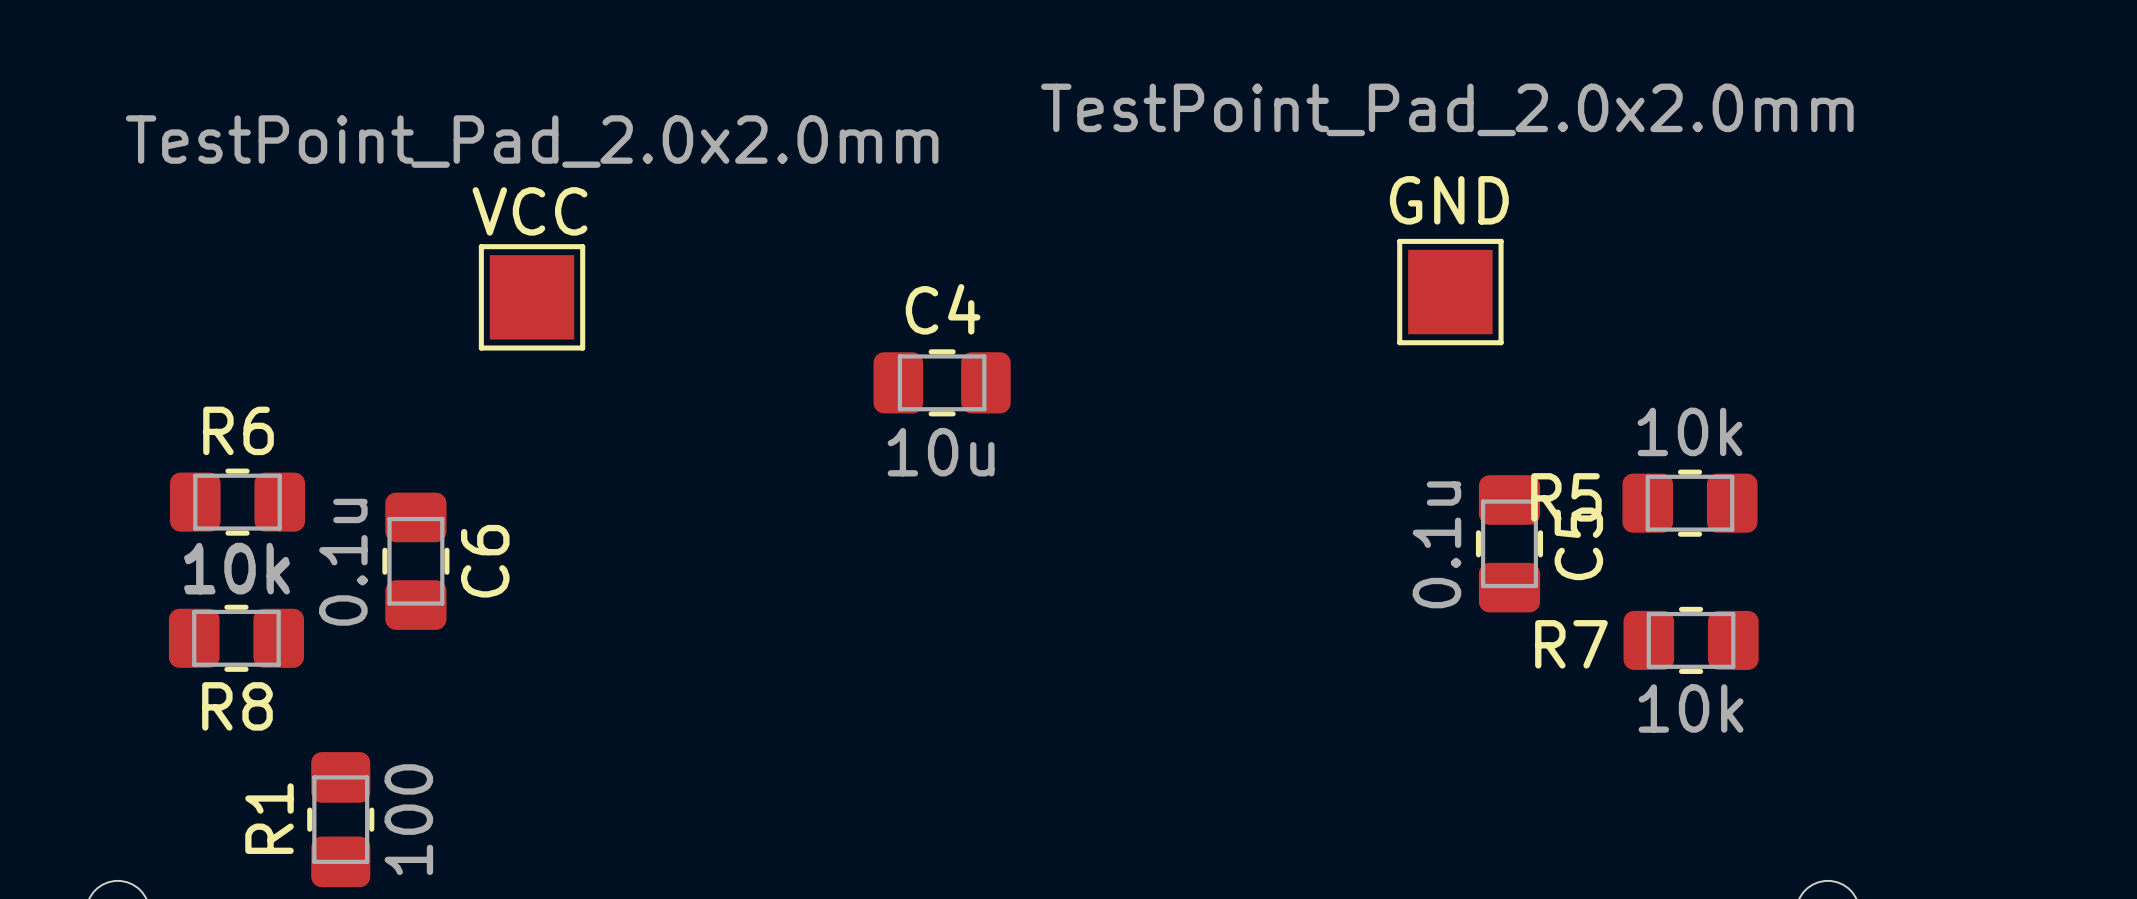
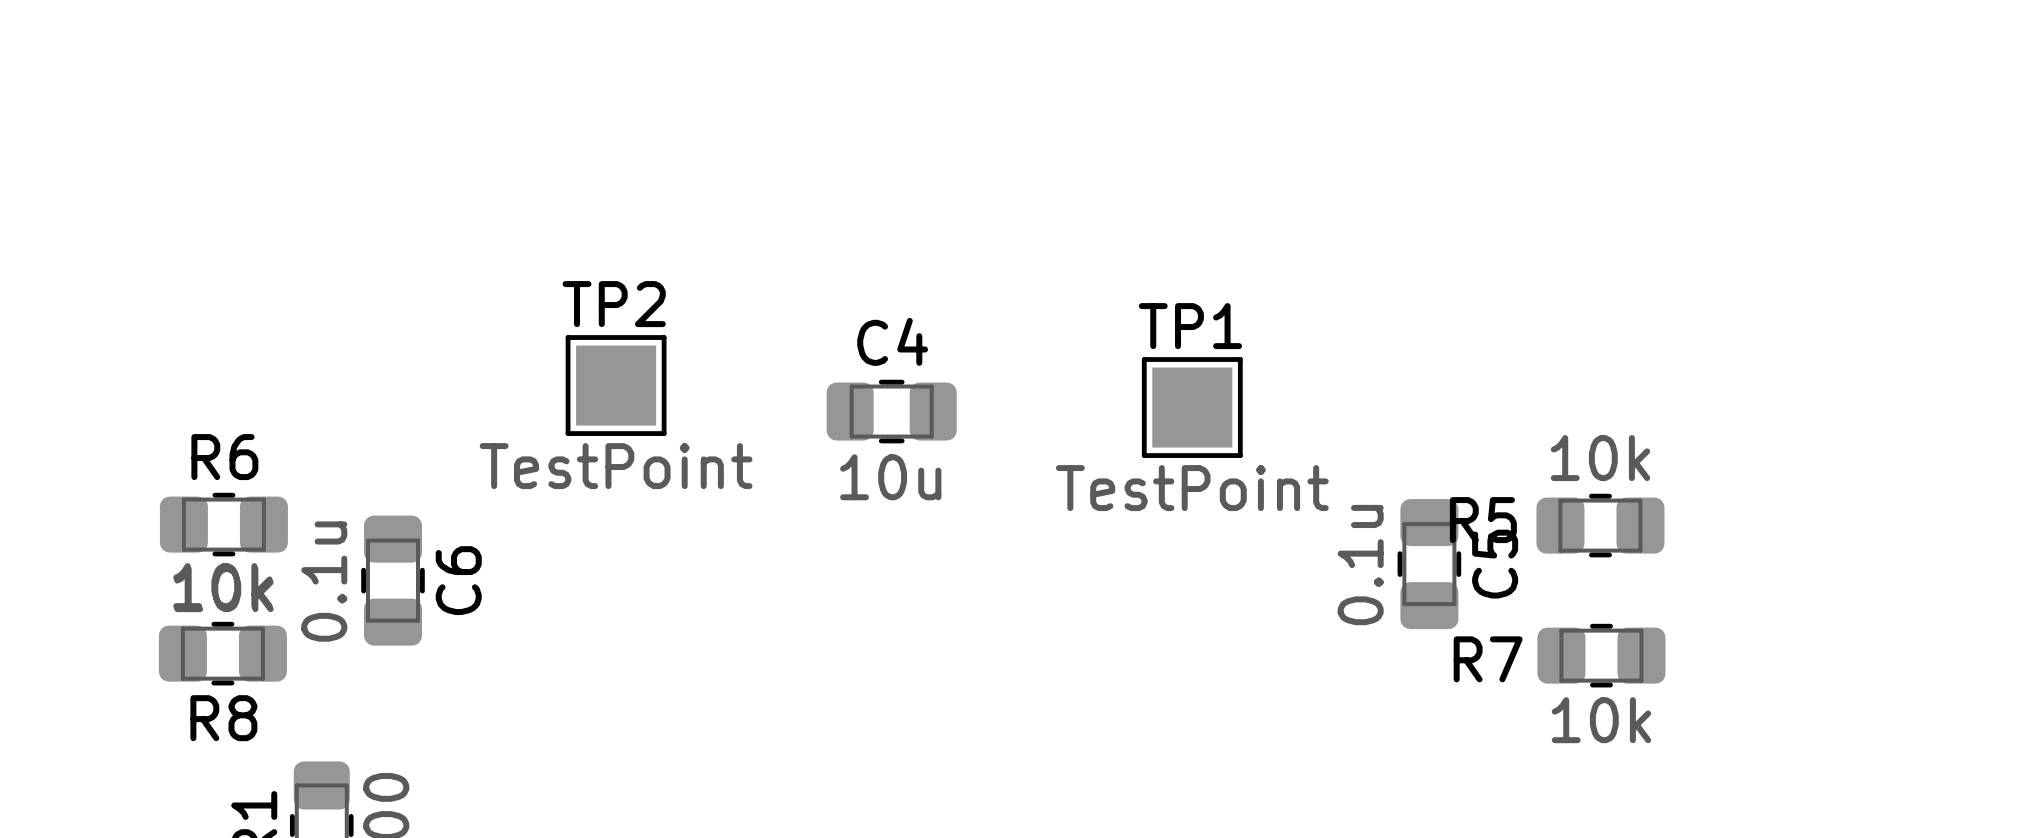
GND: TestPoint_Pad_2.0x2.0mm (1450, 292) -> none
VCC: TestPoint_Pad_2.0x2.0mm (532, 297) -> none
TP2: none -> TestPoint (616, 385)
TP1: none -> TestPoint (1192, 407)

